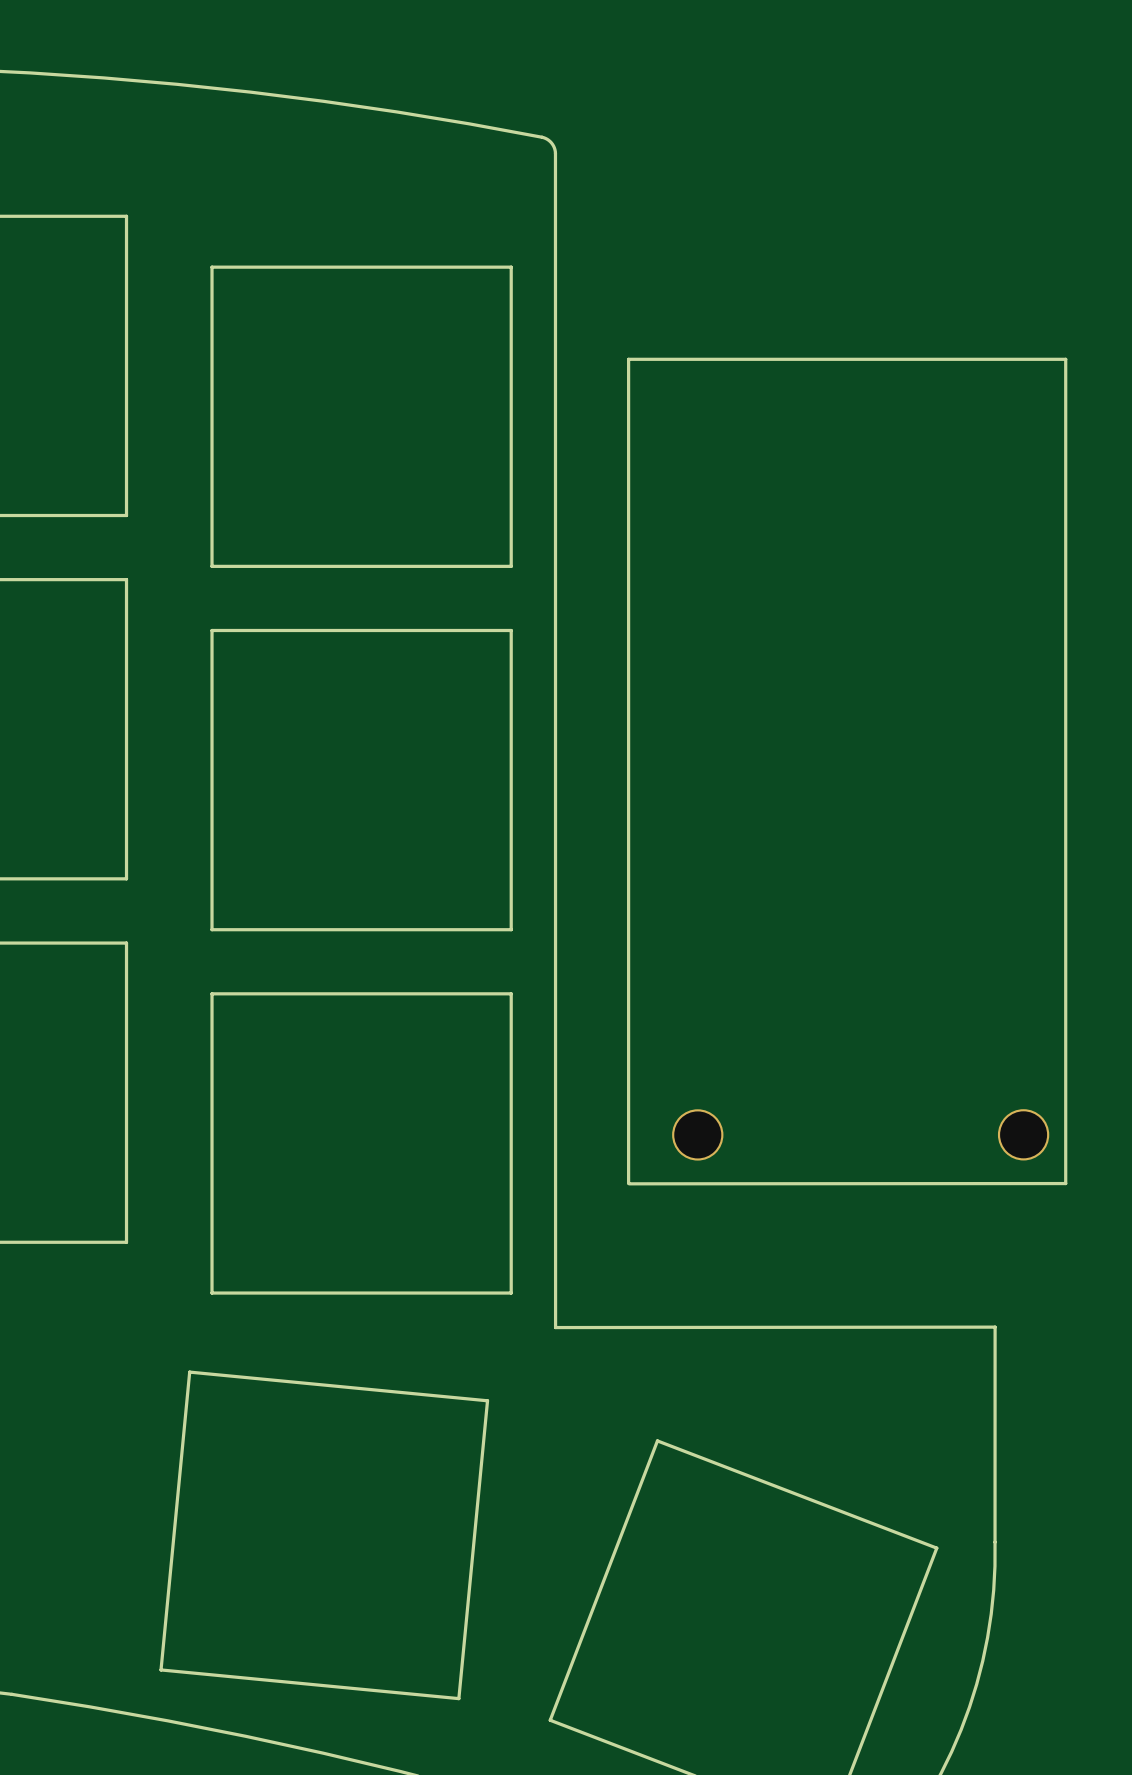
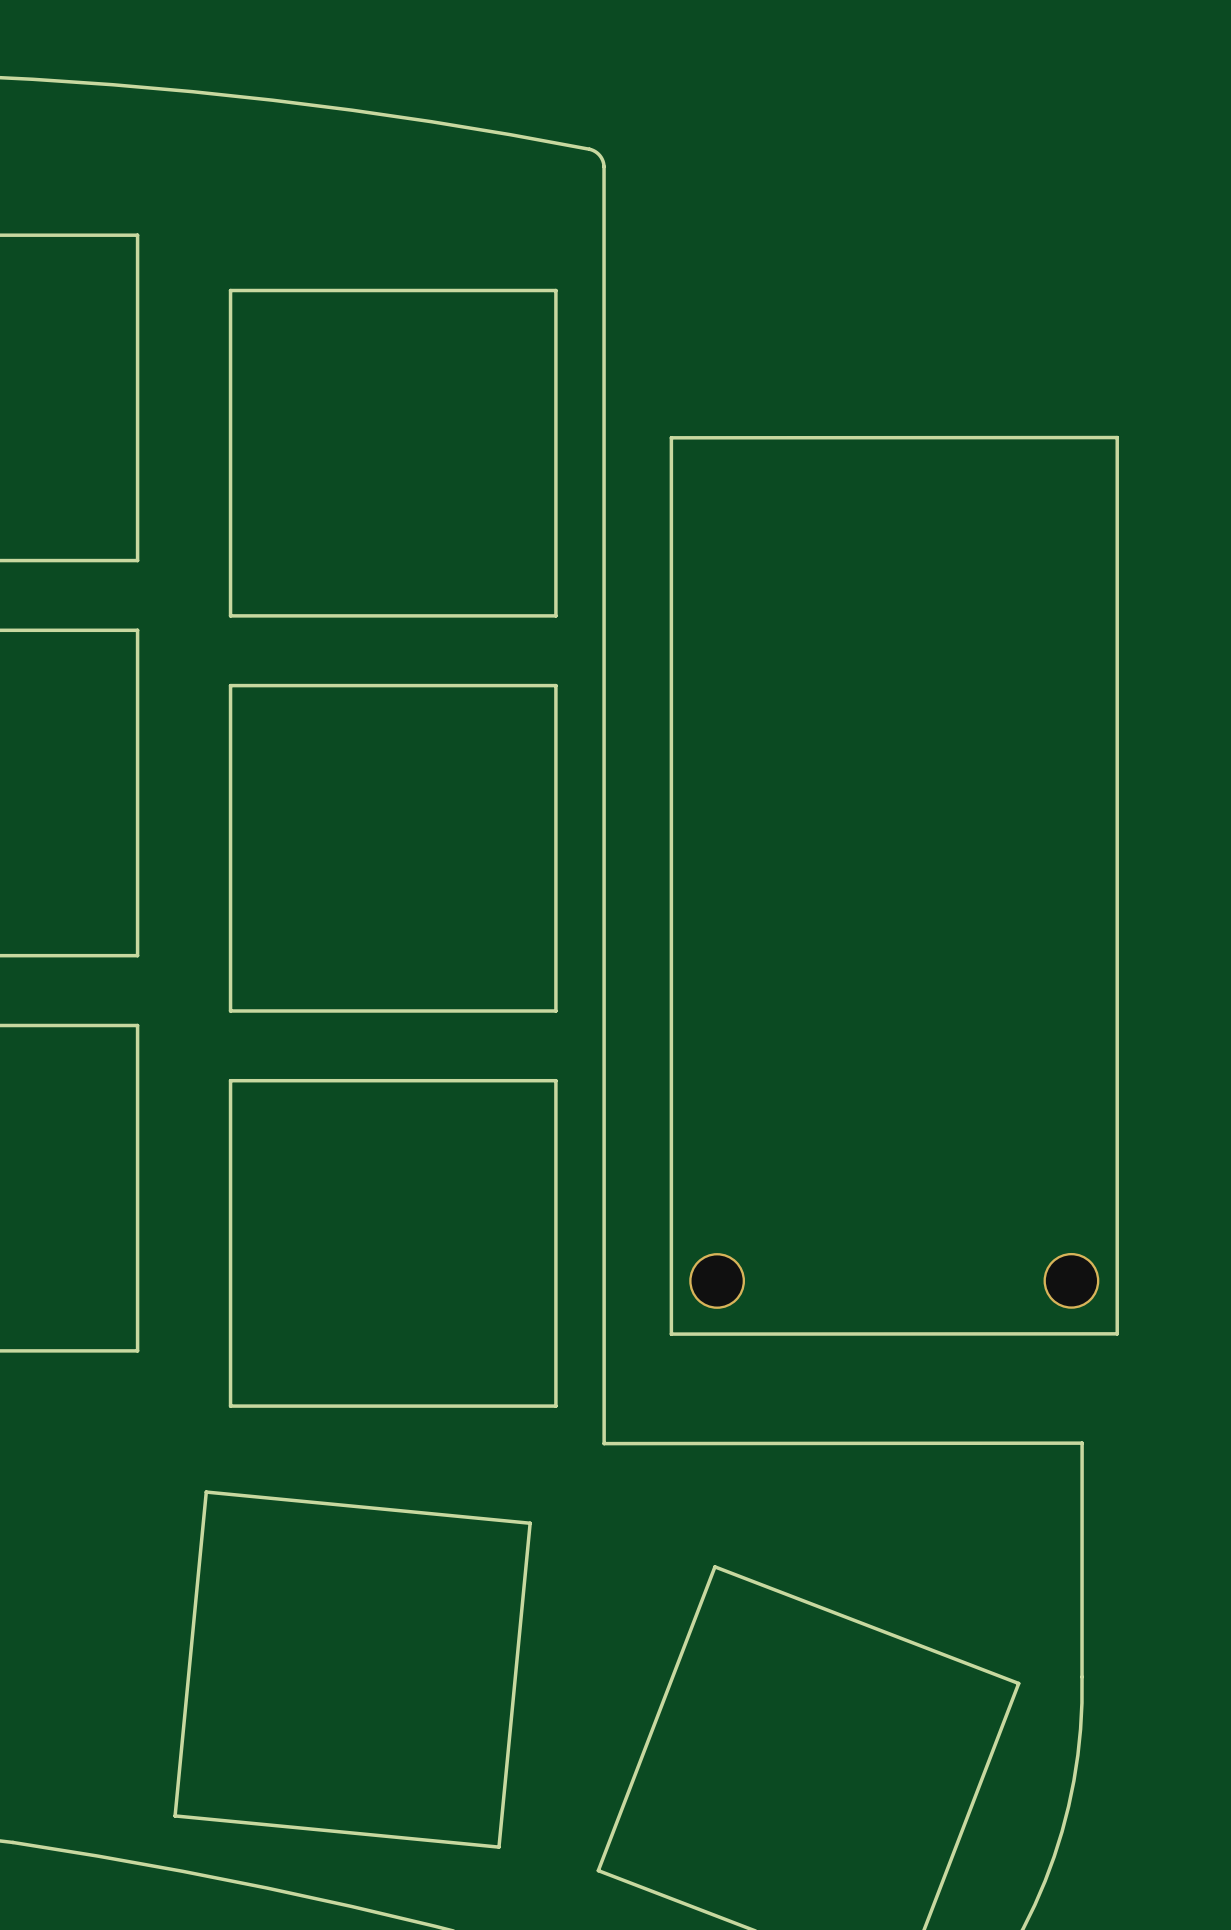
board edge: none -> (1117, 437) (671, 437) (671, 1334) (1117, 1333) (1117, 437)
part position: (697, 1134) -> (717, 1280)
part position: (1023, 1134) -> (1071, 1280)
board edge: (628, 1183) (628, 359) (1065, 359) (1065, 1183) (629, 1183) -> none

